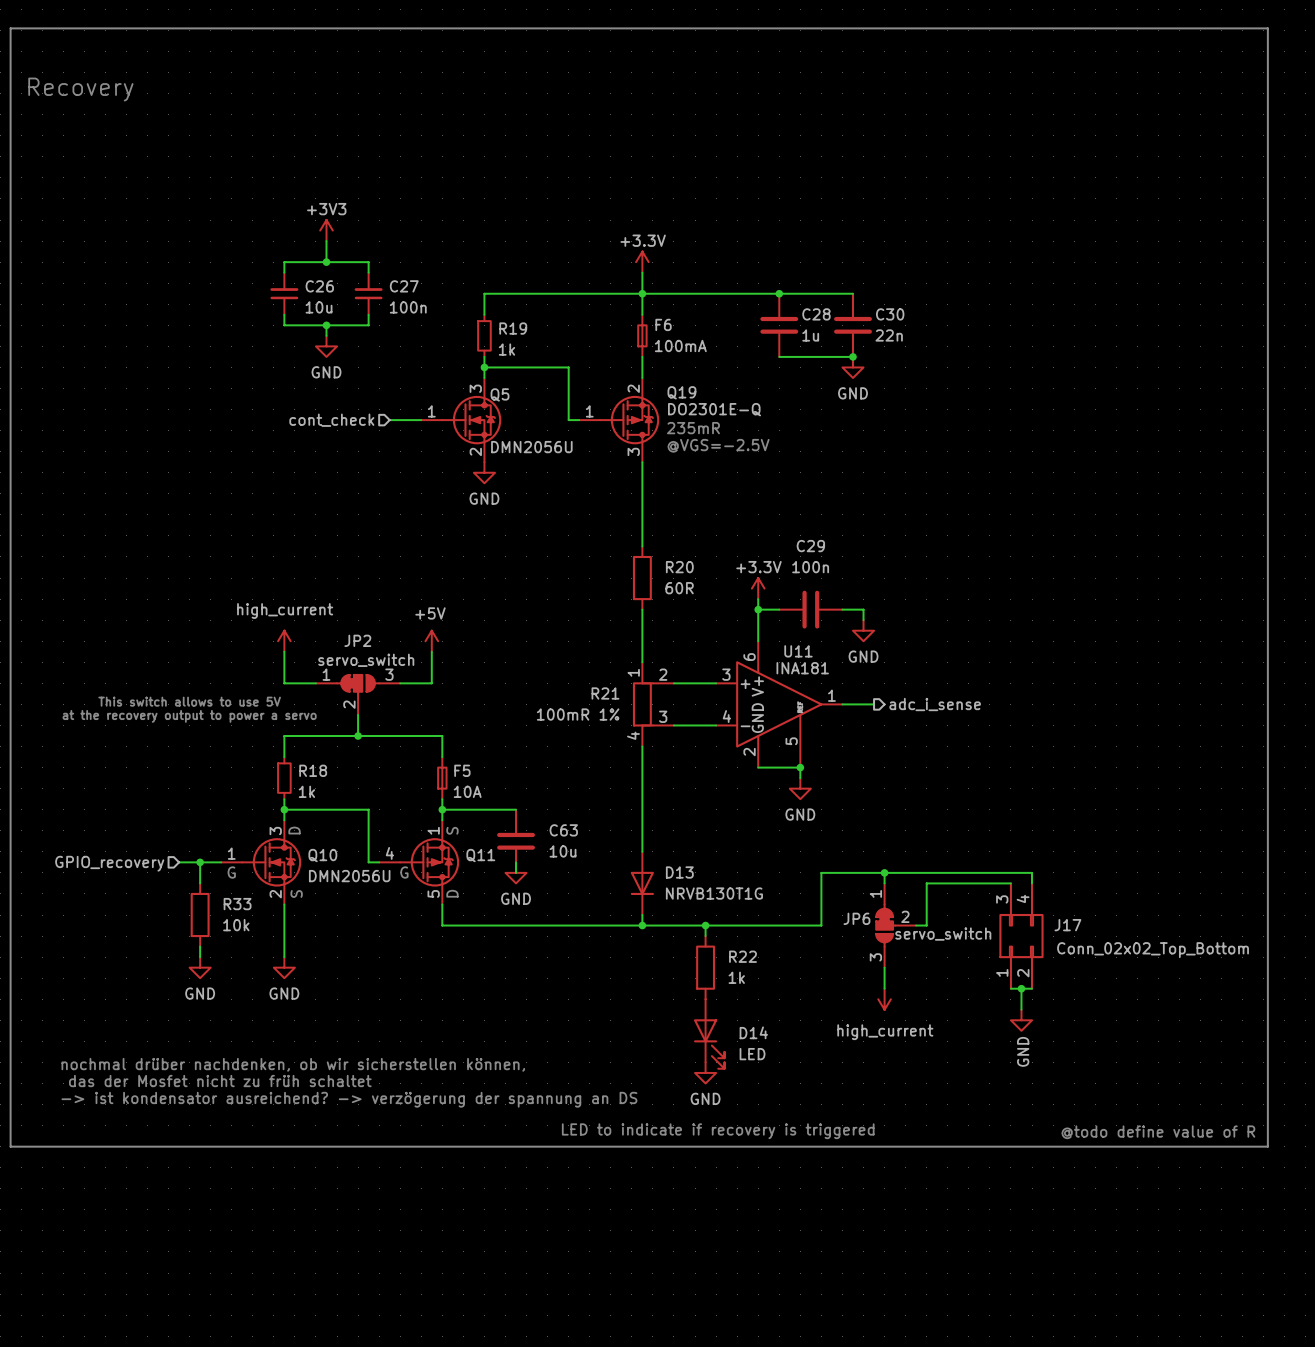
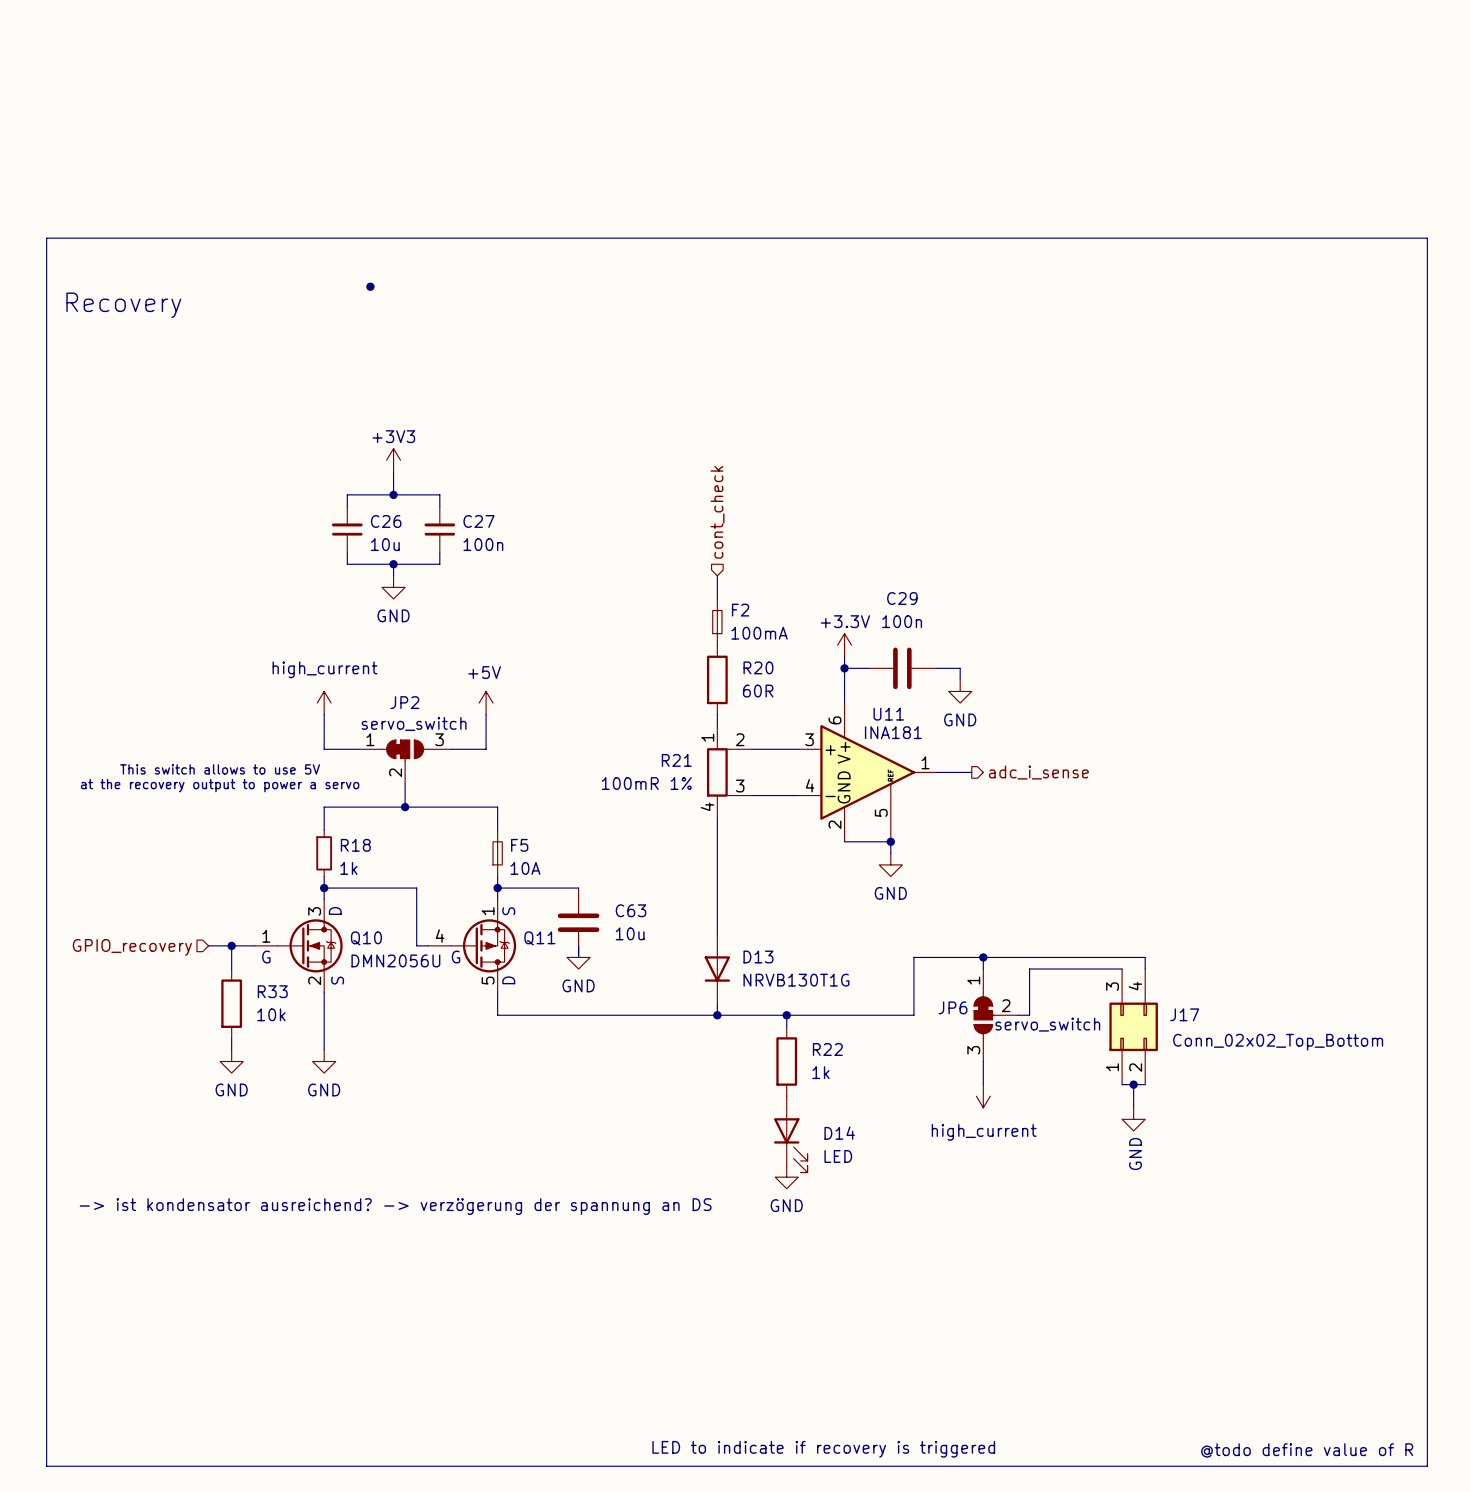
line: (10, 28) (1267, 28) (1267, 1146) (10, 1146) (10, 28) -> (46, 238) (1427, 238) (1427, 1466) (46, 1466) (46, 238)
text position: Recovery (80, 89) -> Recovery (123, 305)
power symbol position: +3V3 (326, 230) -> +3V3 (393, 460)
wire: (326, 241) (326, 262) -> (393, 471) (393, 494)
power symbol: +3.3V (642, 262) -> none
wire: (284, 272) (284, 262) (368, 262) (368, 272) -> (347, 506) (347, 494) (439, 494) (439, 506)
wire: (642, 272) (642, 314) -> none
C26 position: (284, 293) -> (347, 529)
C27 position: (368, 293) -> (439, 529)
junction: (642, 293) -> none
junction: (779, 293) -> none
wire: (852, 293) (484, 293) (484, 314) -> none
wire: (284, 314) (284, 325) (368, 325) (368, 314) -> (347, 552) (347, 564) (439, 564) (439, 552)
wire: (326, 325) (326, 335) -> (393, 564) (393, 575)
junction: (326, 325) -> none
C28: 1u (779, 325) -> none
C30: 22n (852, 325) -> none
R19: 1k (484, 335) -> none
F6: 100mA (642, 335) -> none
power symbol: GND (326, 346) -> none
wire: (484, 356) (484, 377) -> none
wire: (642, 356) (642, 377) -> none
wire: (779, 356) (852, 356) -> none
junction: (852, 356) -> none
wire: (484, 367) (568, 367) (568, 420) (579, 420) -> none
junction: (484, 367) -> none
power symbol: GND (852, 367) -> none
hierarchical label: cont_check (331, 420) -> none
wire: (389, 420) (421, 420) -> none
Q5: DMN2056U (461, 420) -> none
Q19: DO2301E-Q (619, 420) -> none
text: 235mR (693, 428) -> none
text: @VGS=-2.5V (718, 445) -> none
junction: none -> (393, 494)
wire: (642, 462) (642, 525) -> none
hierarchical label: none -> cont_check (717, 512)
power symbol: GND (484, 472) -> none
junction: none -> (393, 564)
power symbol: none -> GND (393, 587)
F2: none -> 100mA (717, 622)
R20 position: (642, 578) -> (717, 679)
wire: (642, 609) (642, 651) -> none
text: nochmal drüber nachdenken, ob wir sicherstellen können, (293, 1064) -> none
text: das der Mosfet nicht zu früh schaltet (220, 1081) -> none
text position: LED to indicate if recovery is triggered (718, 1131) -> LED to indicate if recovery is triggered (823, 1449)
text position: @todo define value of R (1158, 1132) -> @todo define value of R (1307, 1450)

